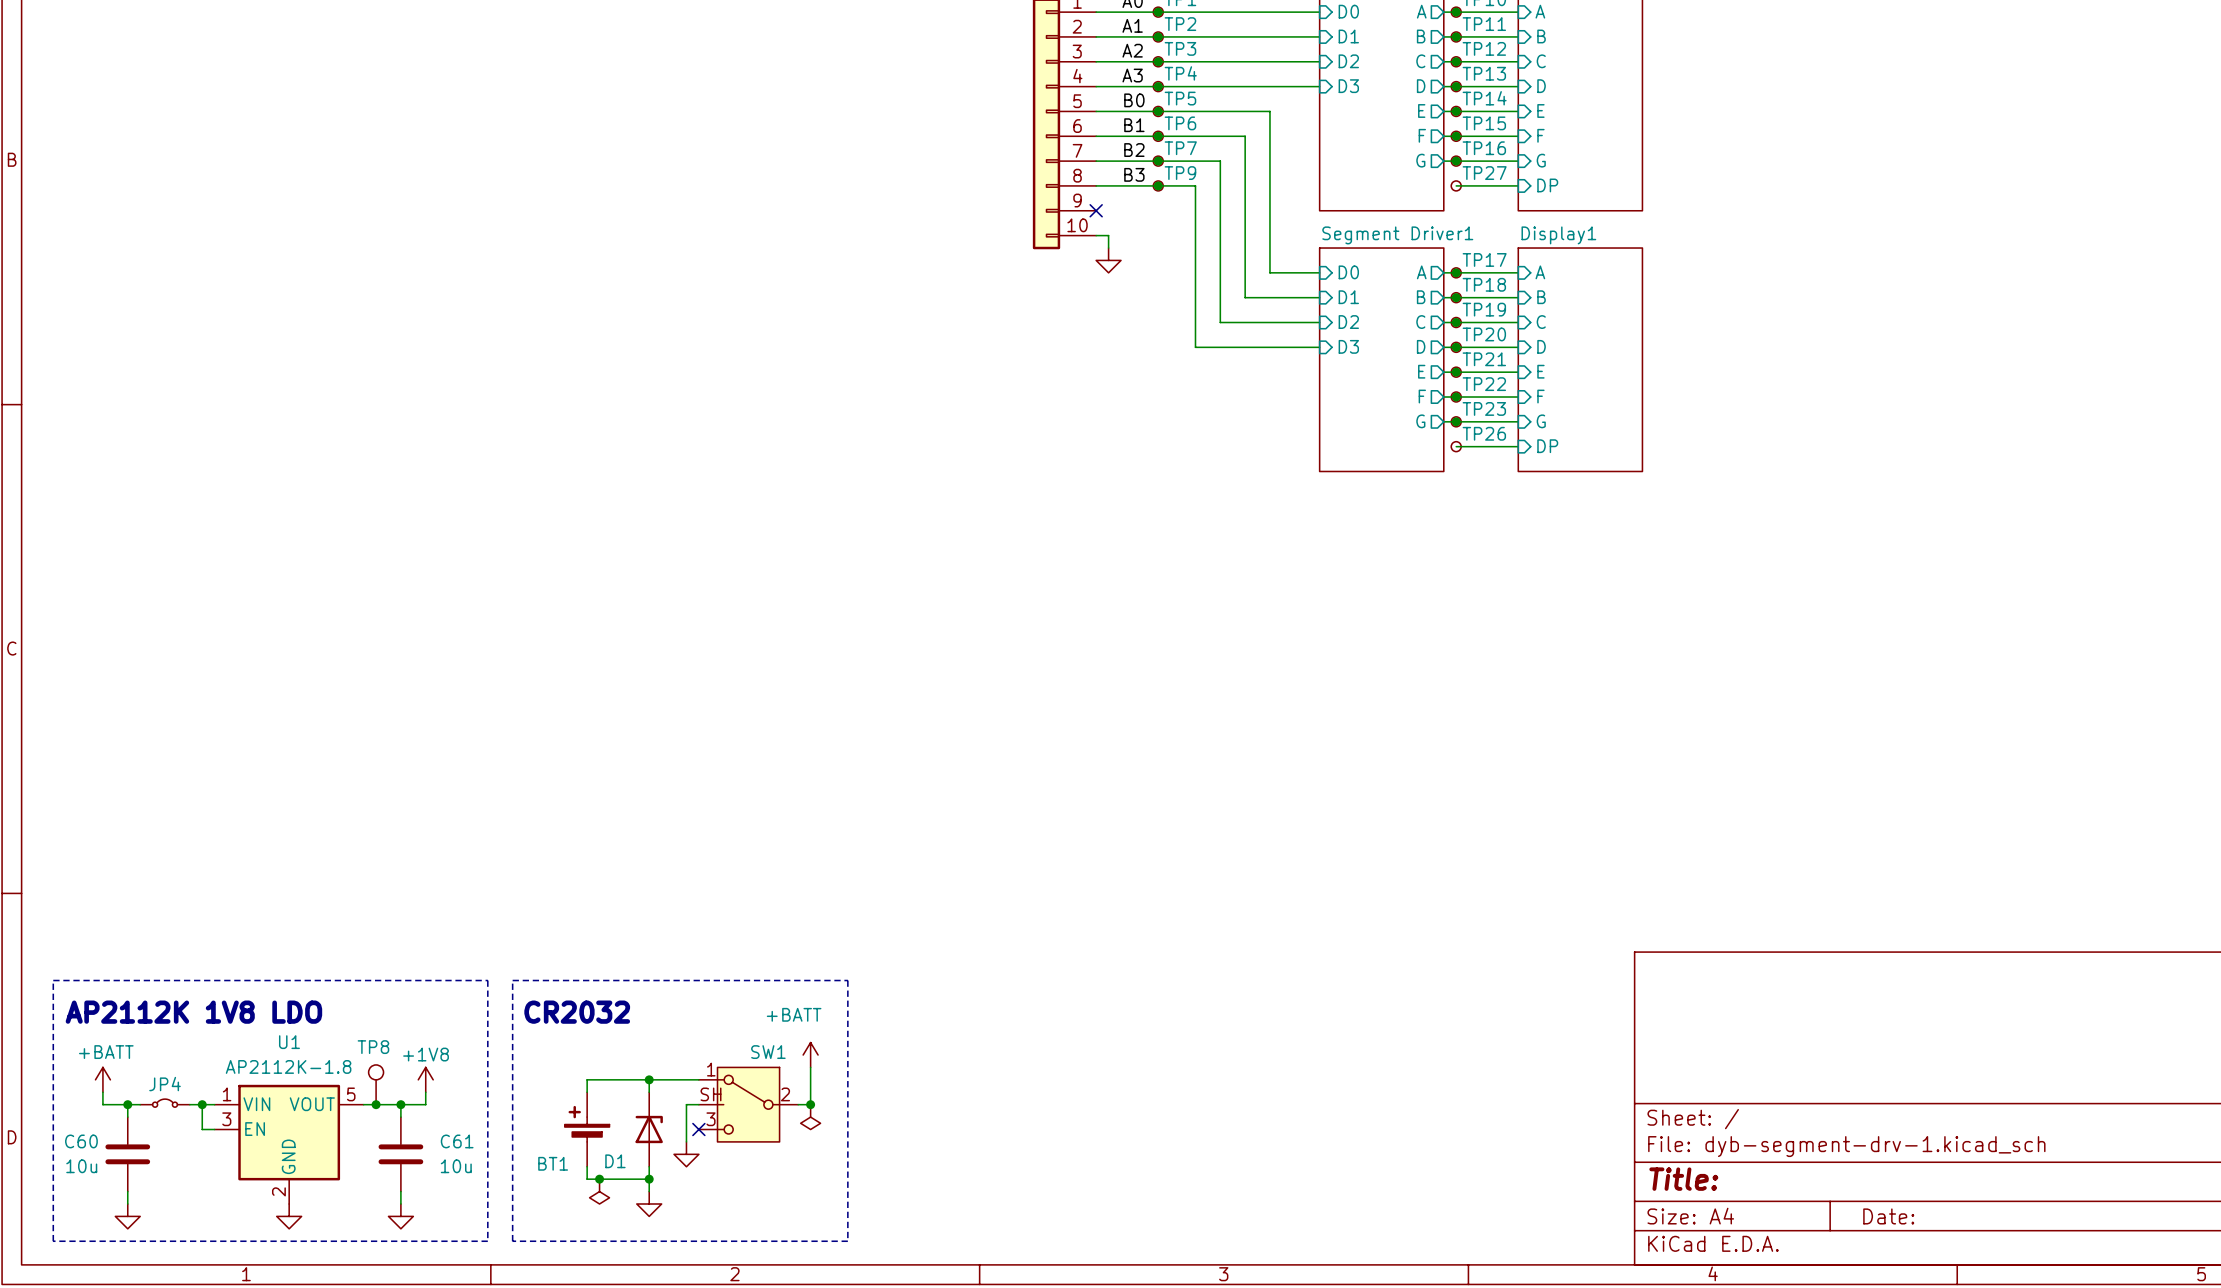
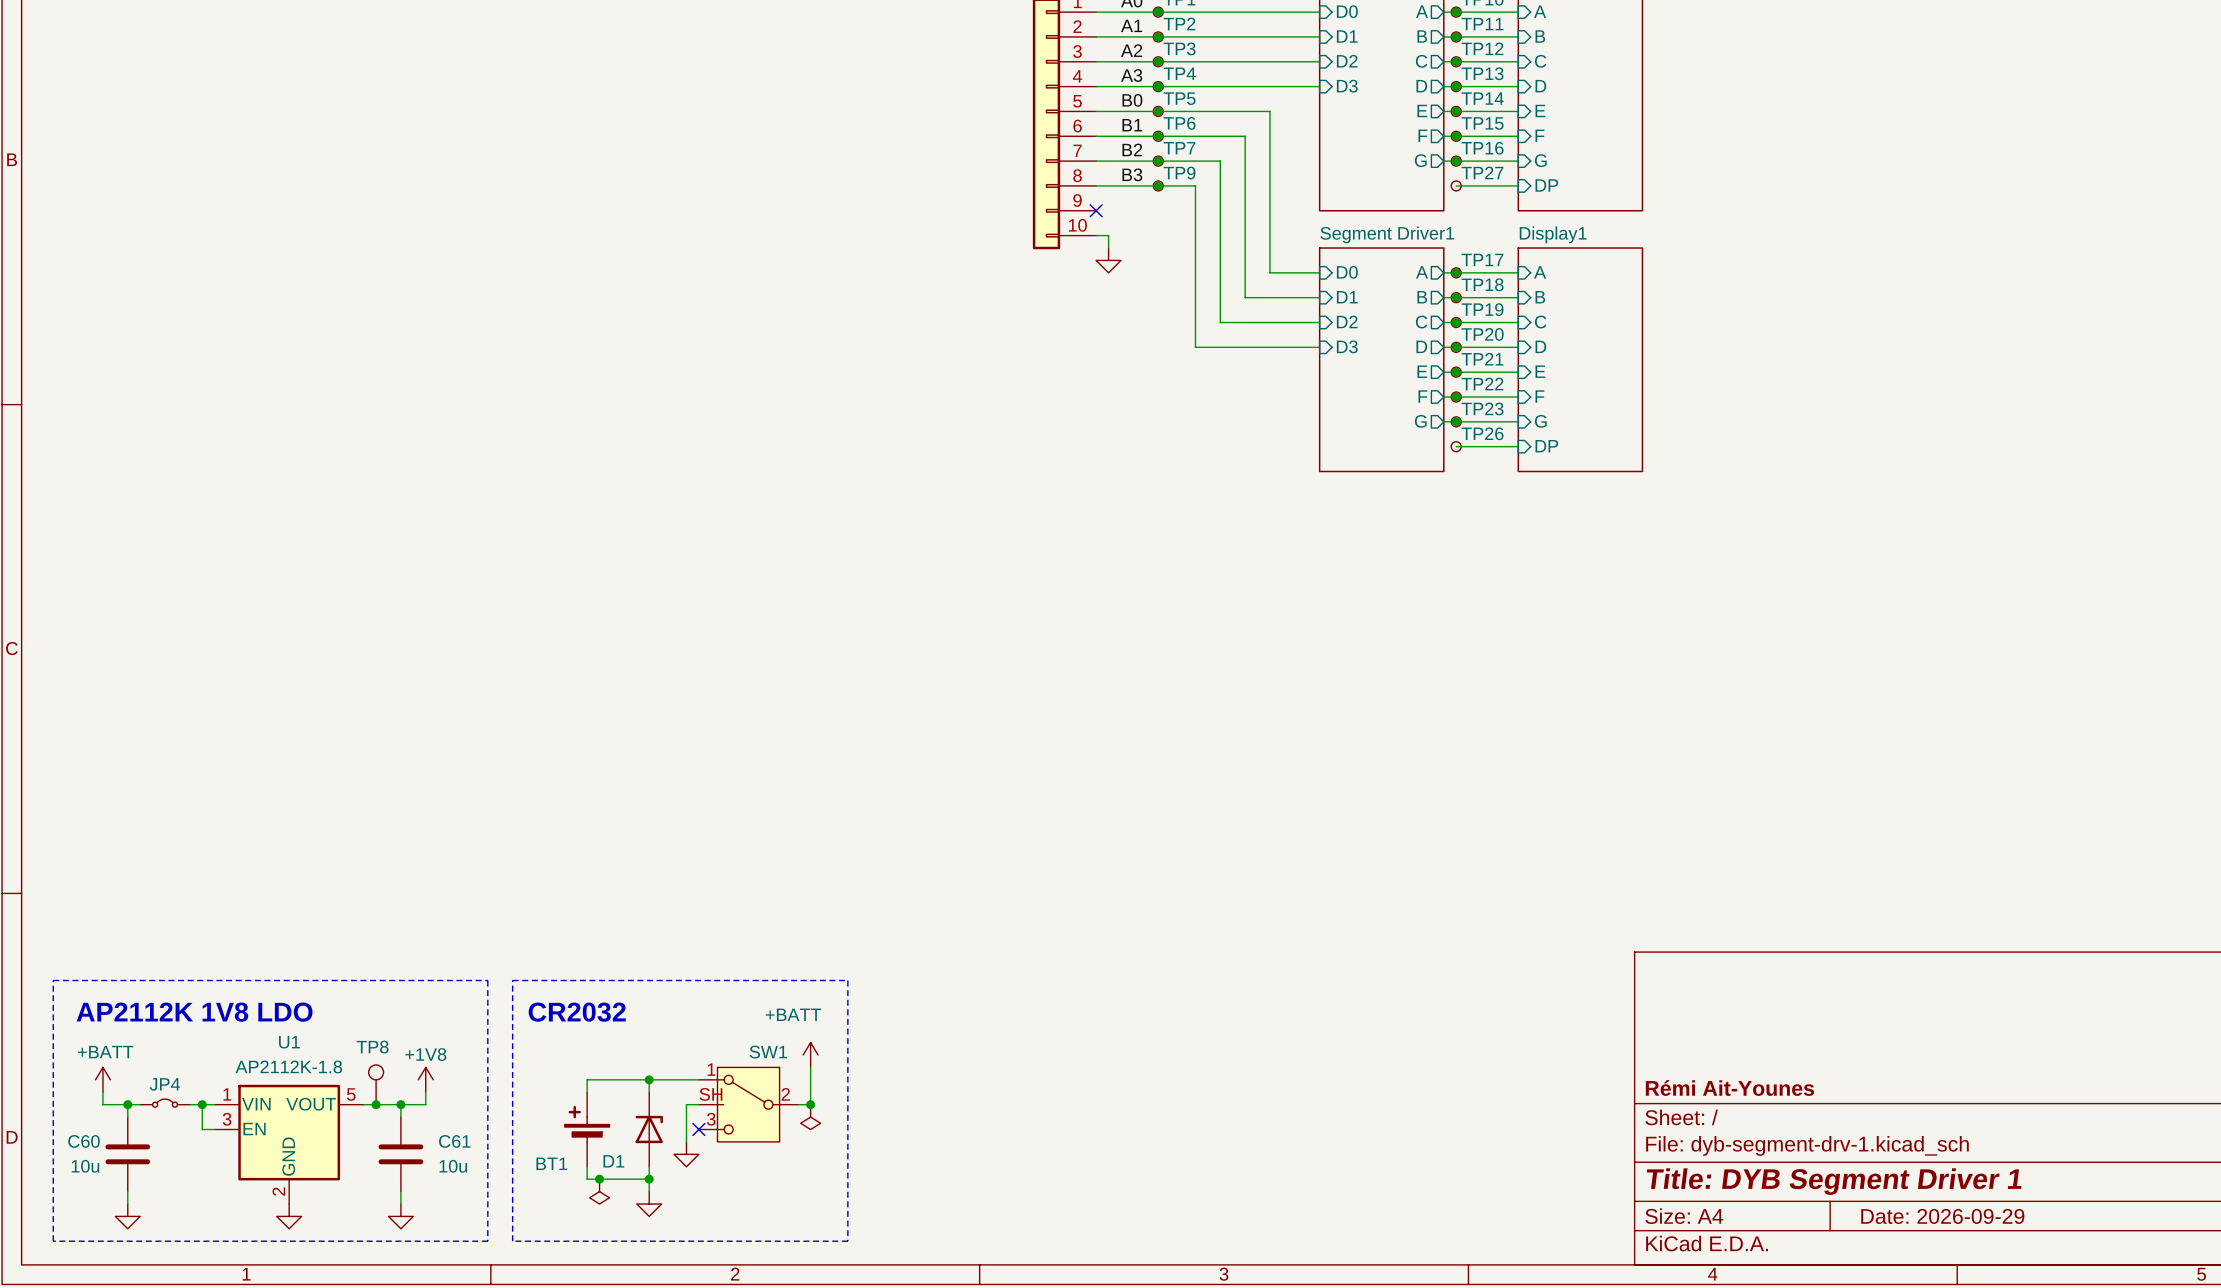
title block: none -> Rémi Ait-Younes (1729, 1088)
title block: Title: (1683, 1179) -> Title: DYB Segment Driver 1 (1834, 1181)
title block: Date: (1888, 1216) -> Date: 2026-09-29 (1942, 1216)

